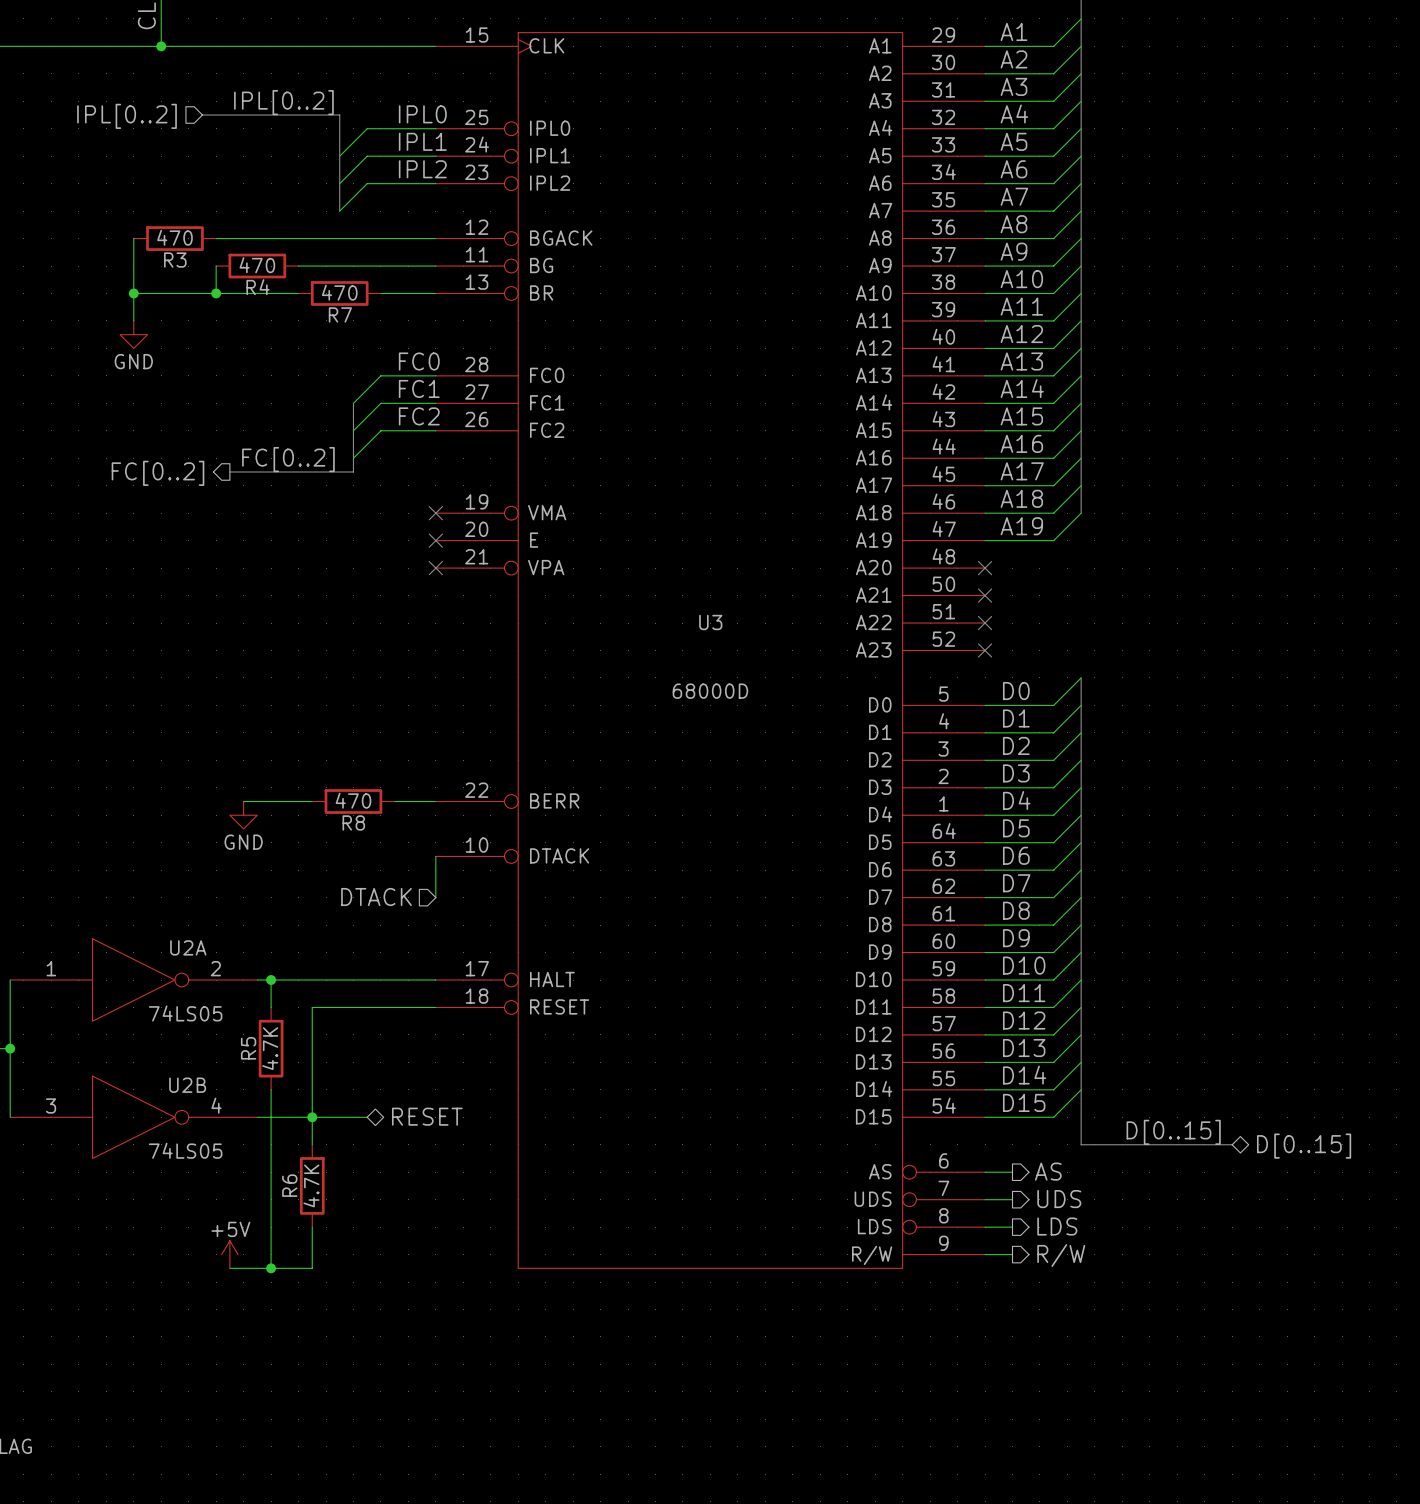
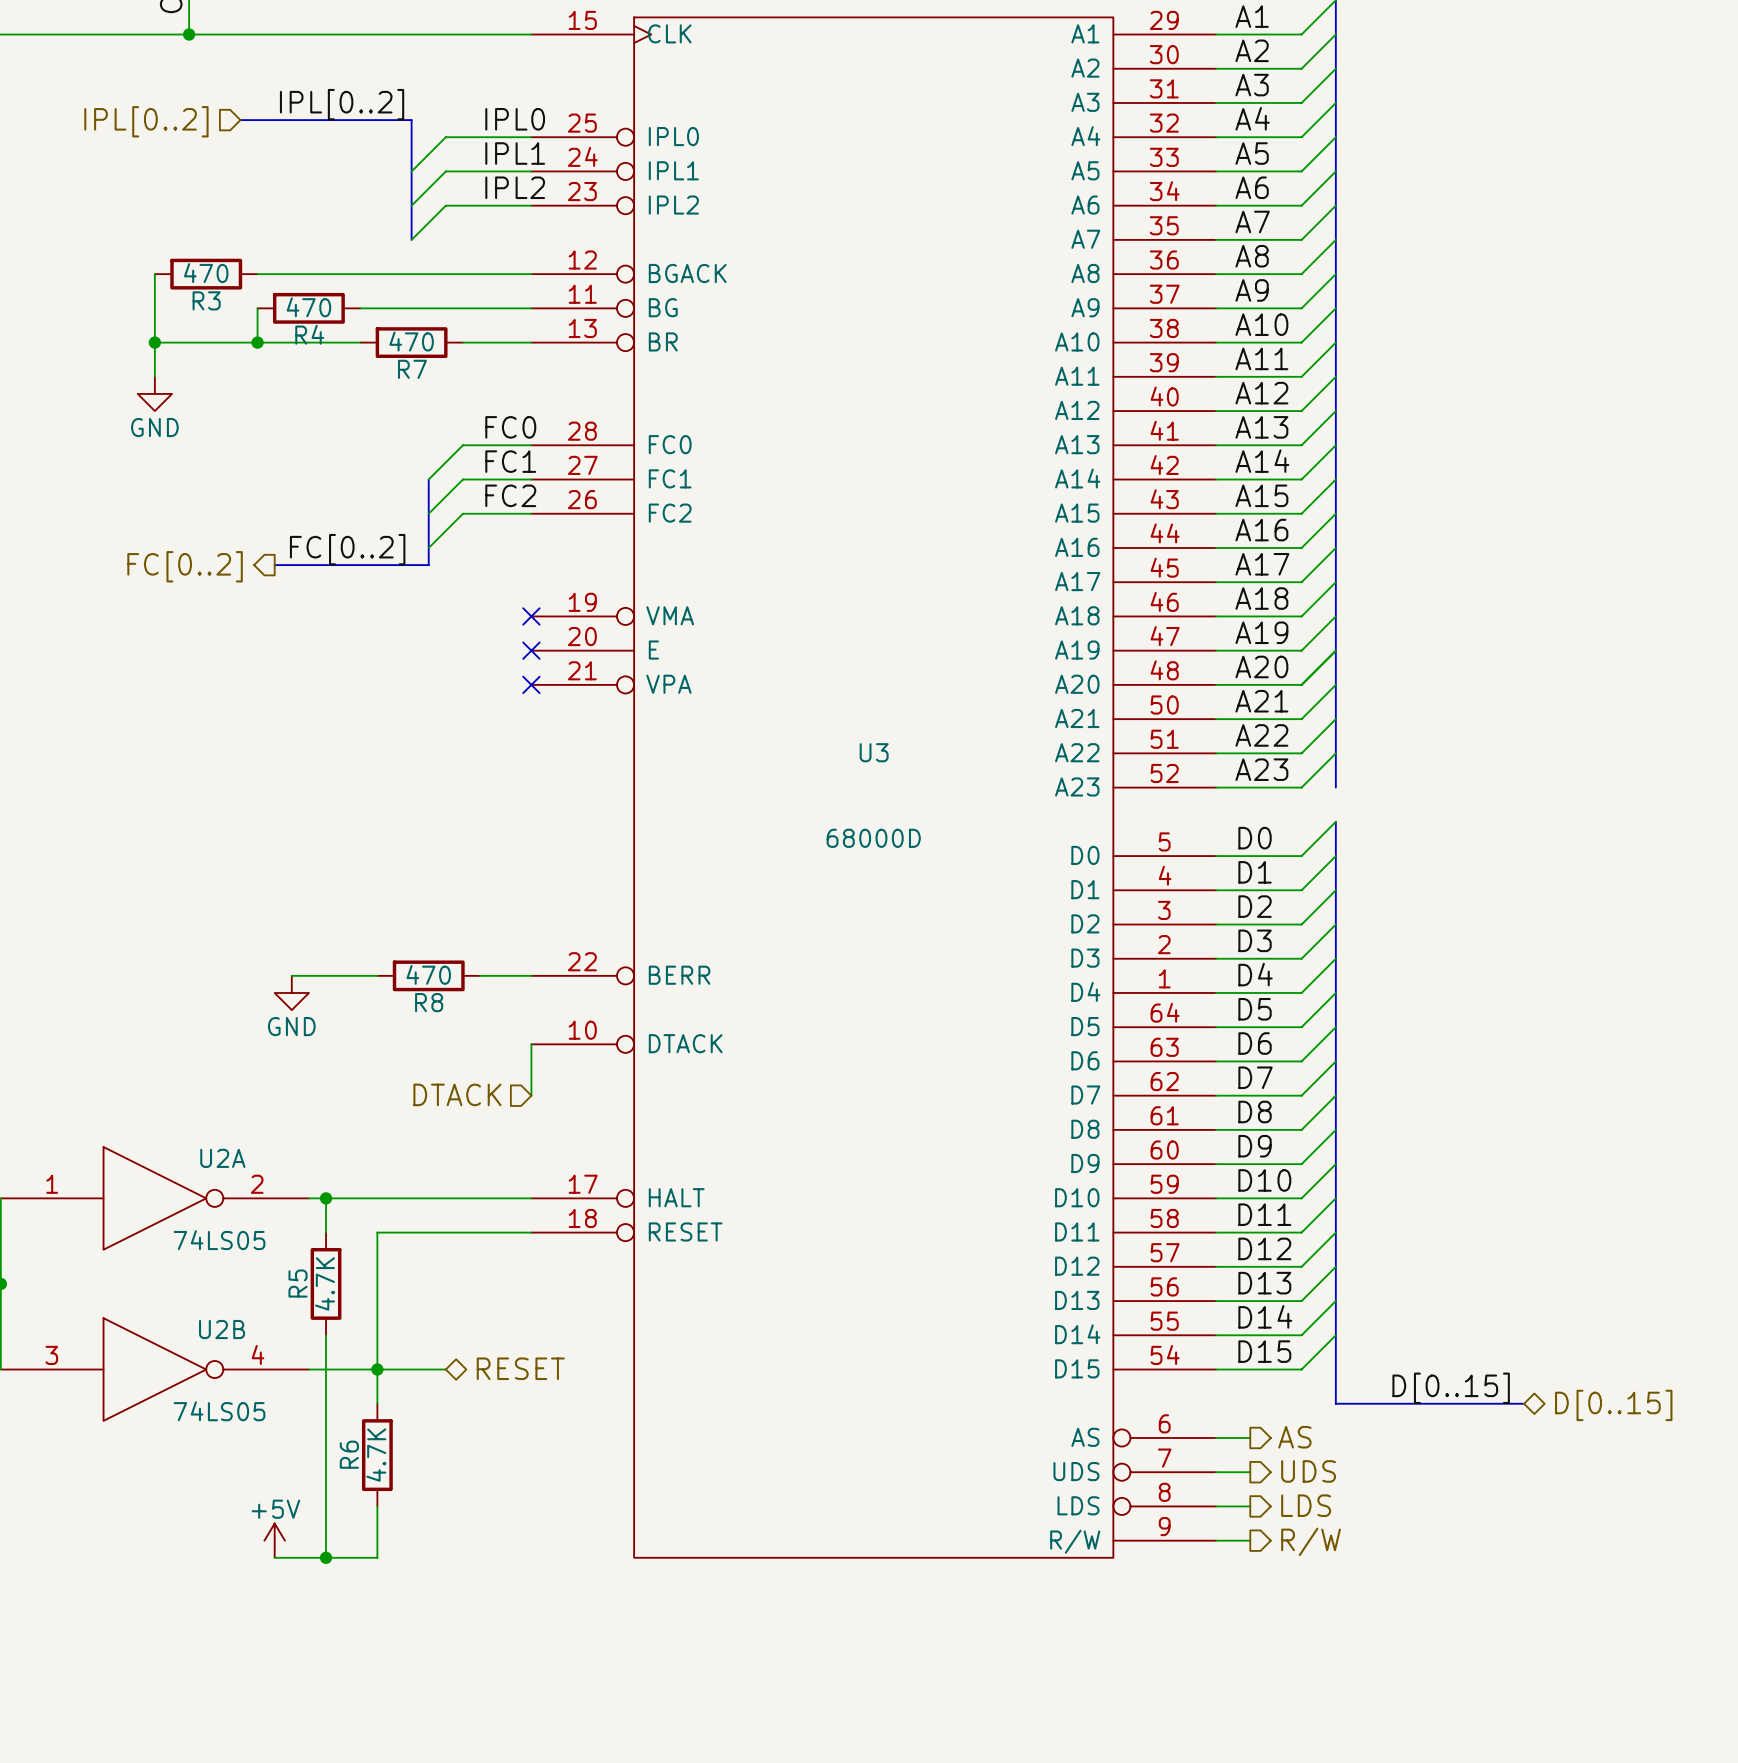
bus: none -> (1335, 616) (1335, 787)
wire: none -> (1335, 650) (1301, 684) (1216, 684)
label: none -> A20 (1261, 666)
no-connect mark: (985, 568) -> none
wire: none -> (1335, 684) (1301, 719) (1216, 719)
label: none -> A21 (1261, 701)
no-connect mark: (985, 595) -> none
wire: none -> (1335, 719) (1301, 753) (1216, 753)
label: none -> A22 (1261, 735)
no-connect mark: (985, 623) -> none
wire: none -> (1335, 753) (1301, 787) (1216, 787)
label: none -> A23 (1261, 769)
no-connect mark: (985, 650) -> none

